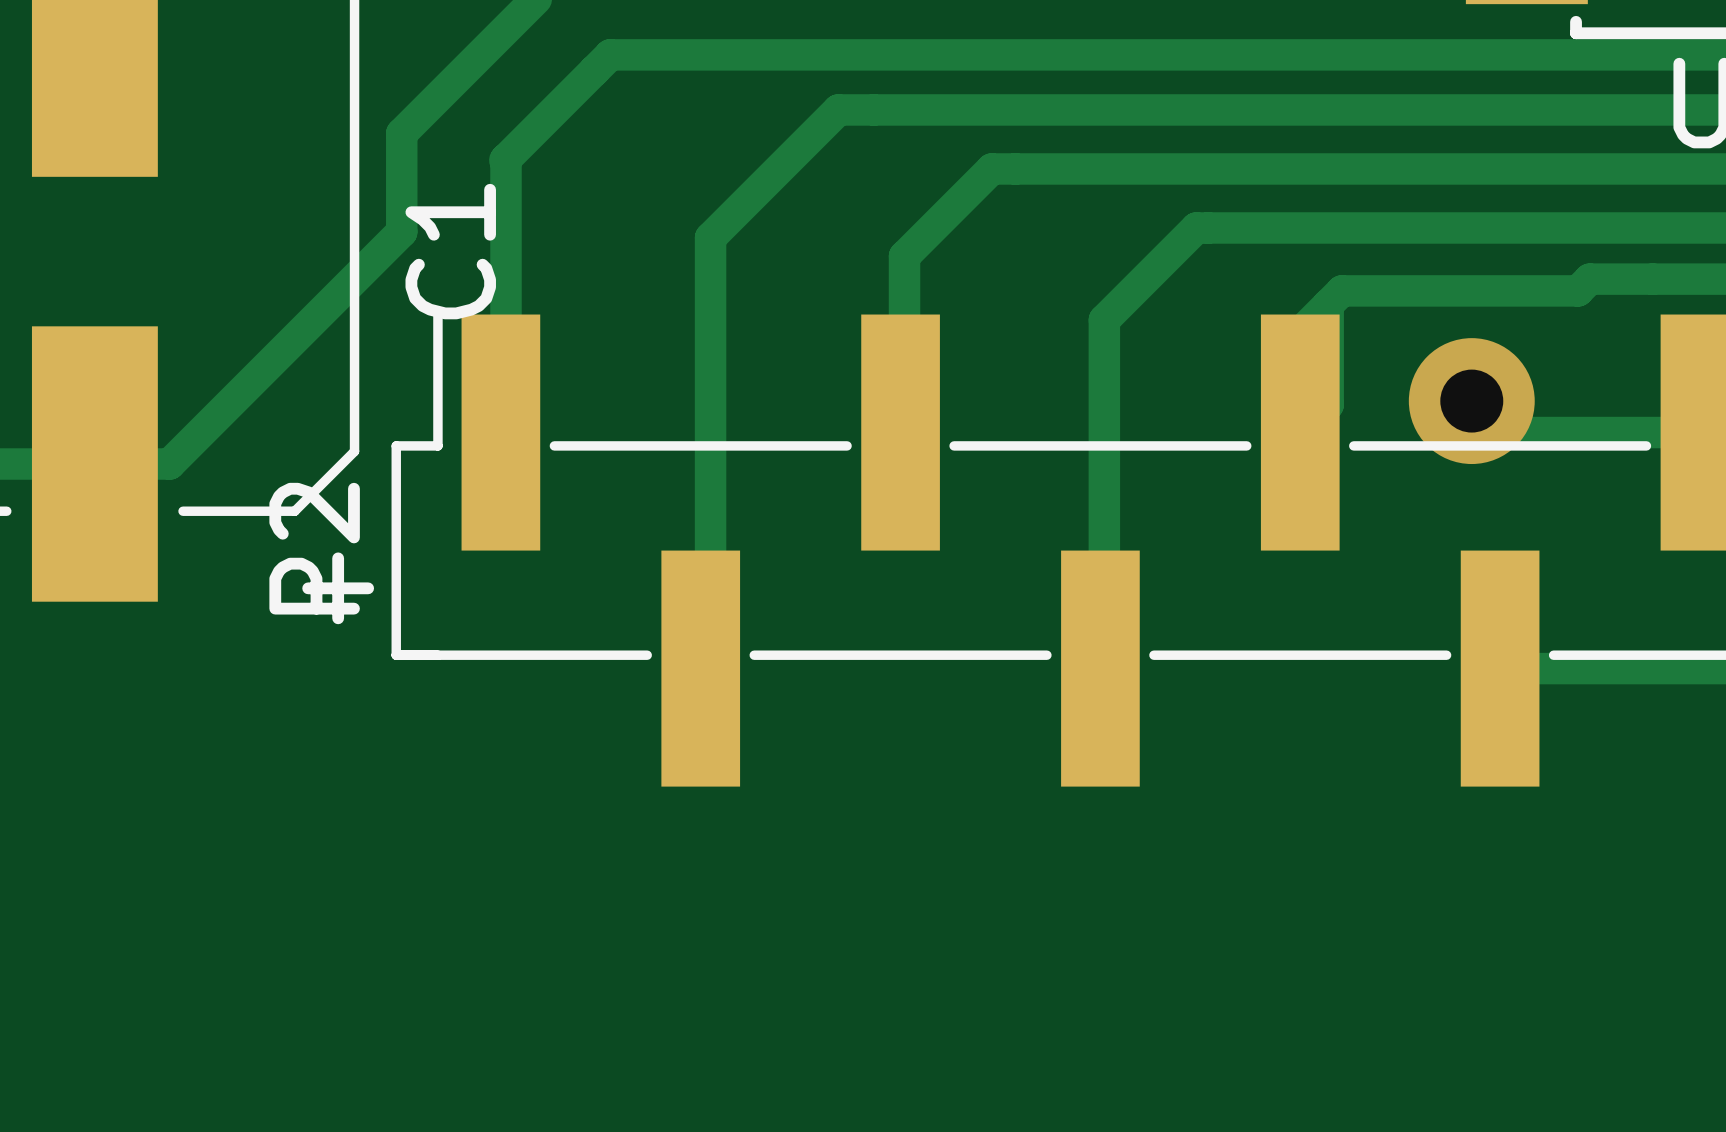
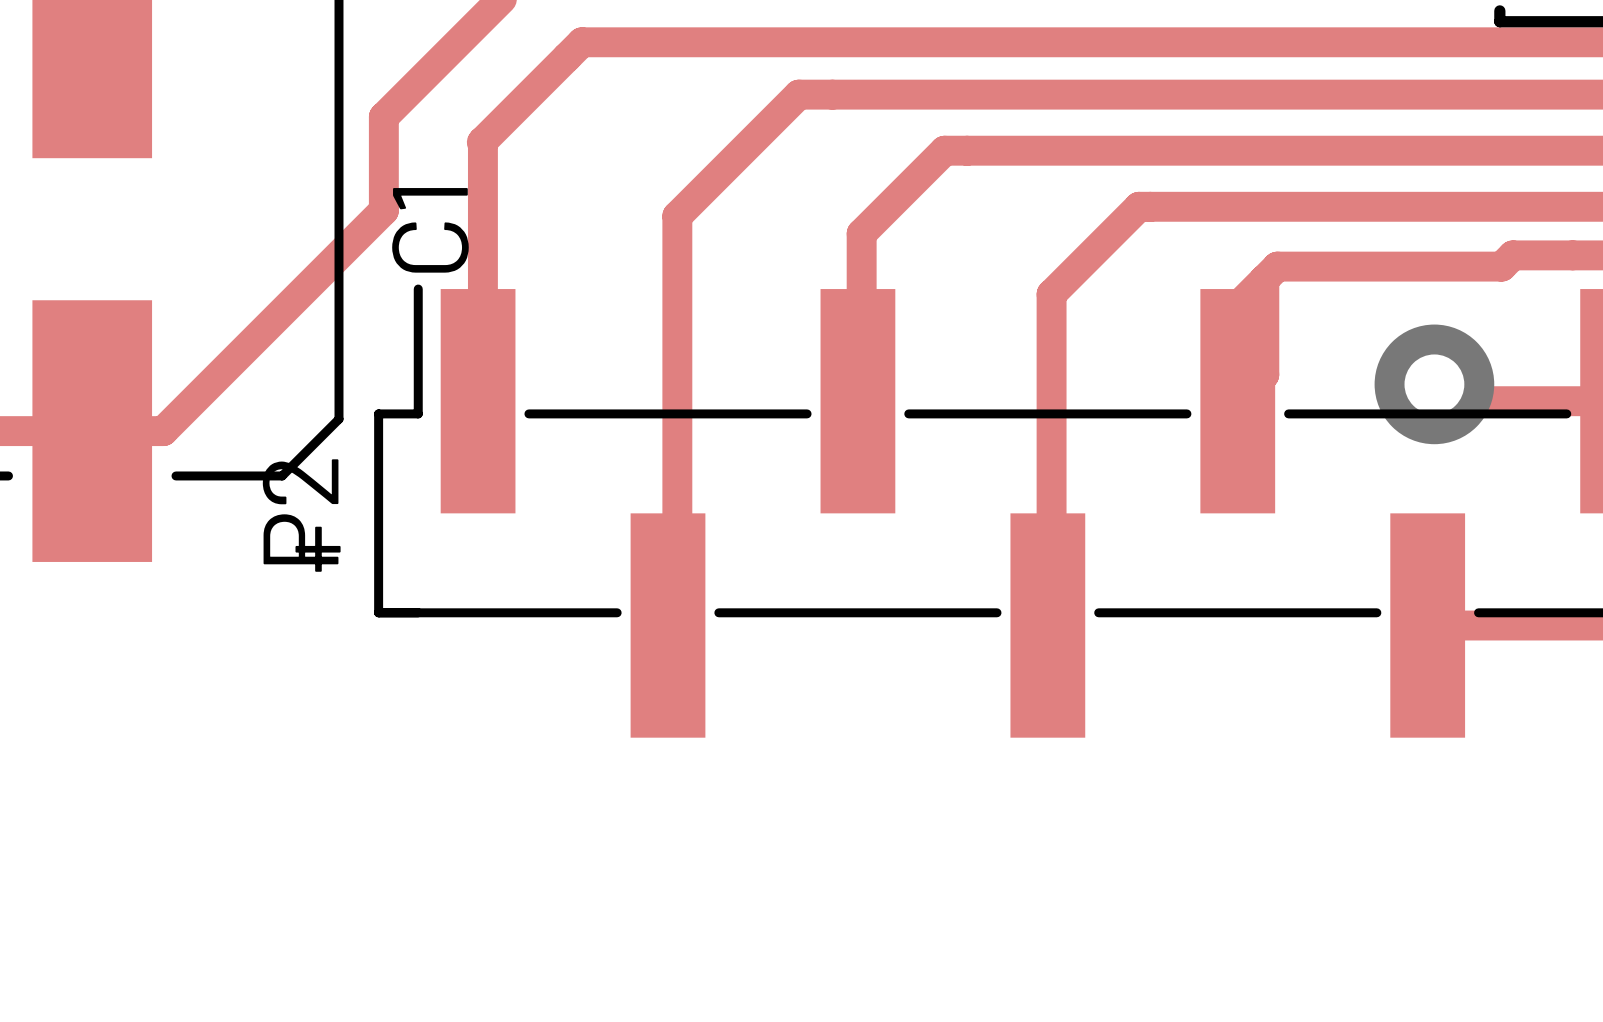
via position: (1471, 401) -> (1434, 384)

